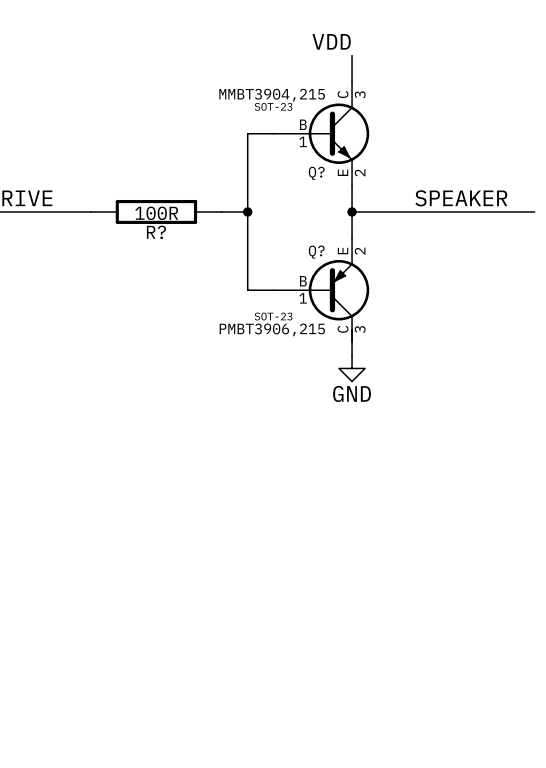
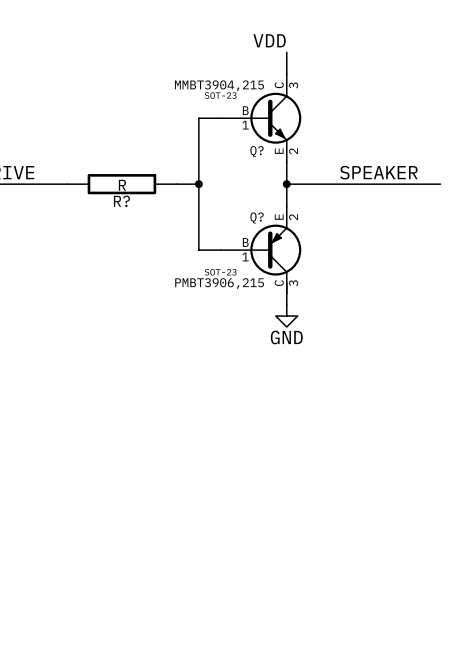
R? value: 100R (156, 213) -> R (122, 185)

